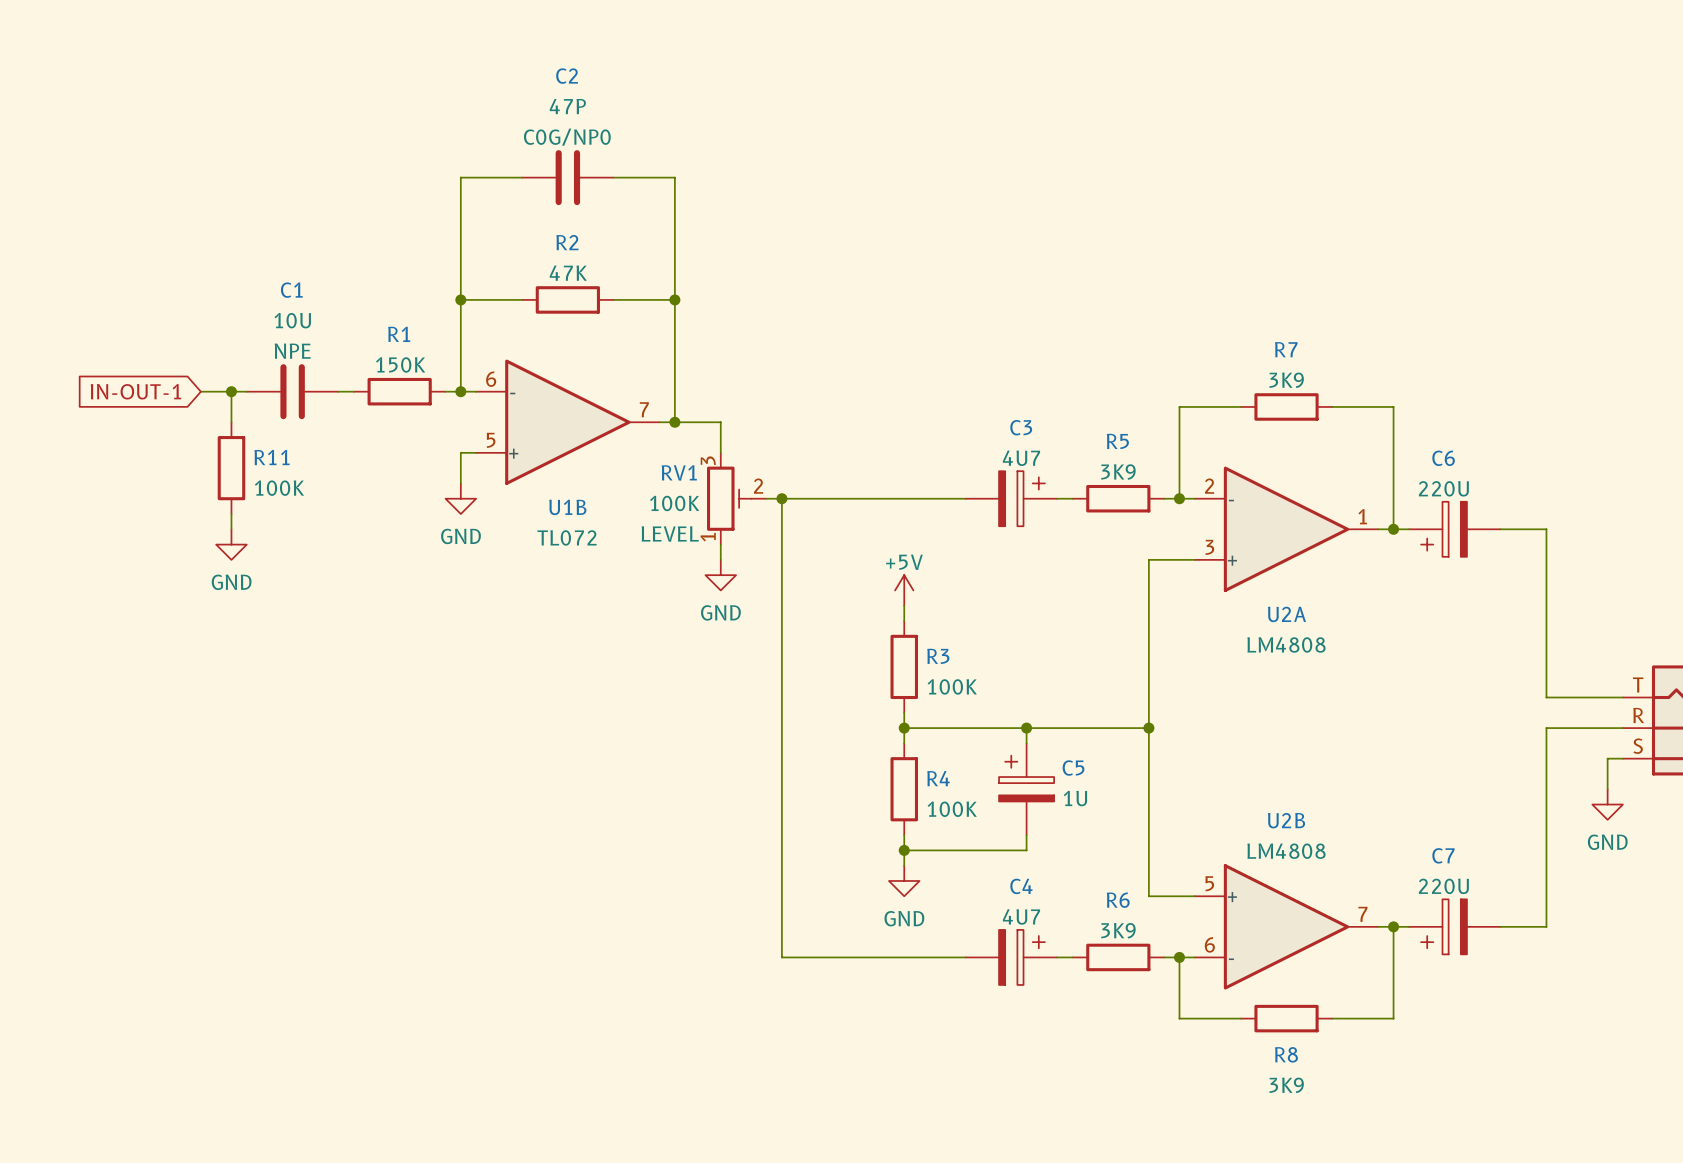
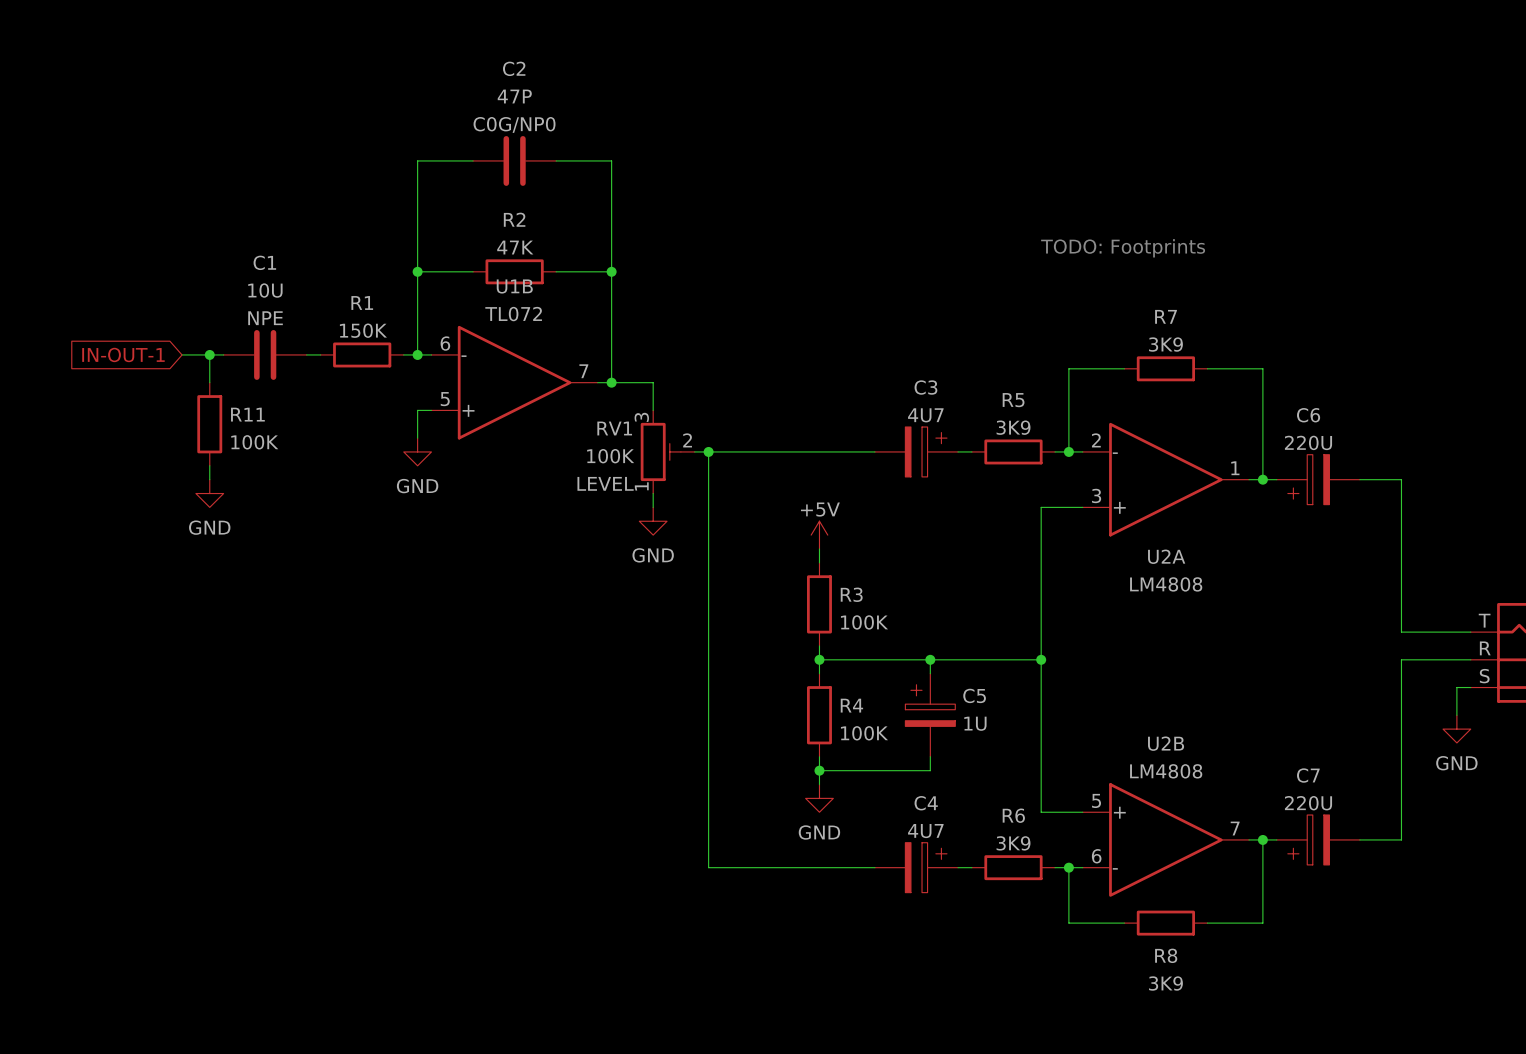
text: none -> TODO: Footprints (1123, 248)
U1B name position: U1B (567, 507) -> U1B (514, 286)
U1B value position: TL072 (567, 537) -> TL072 (513, 314)

